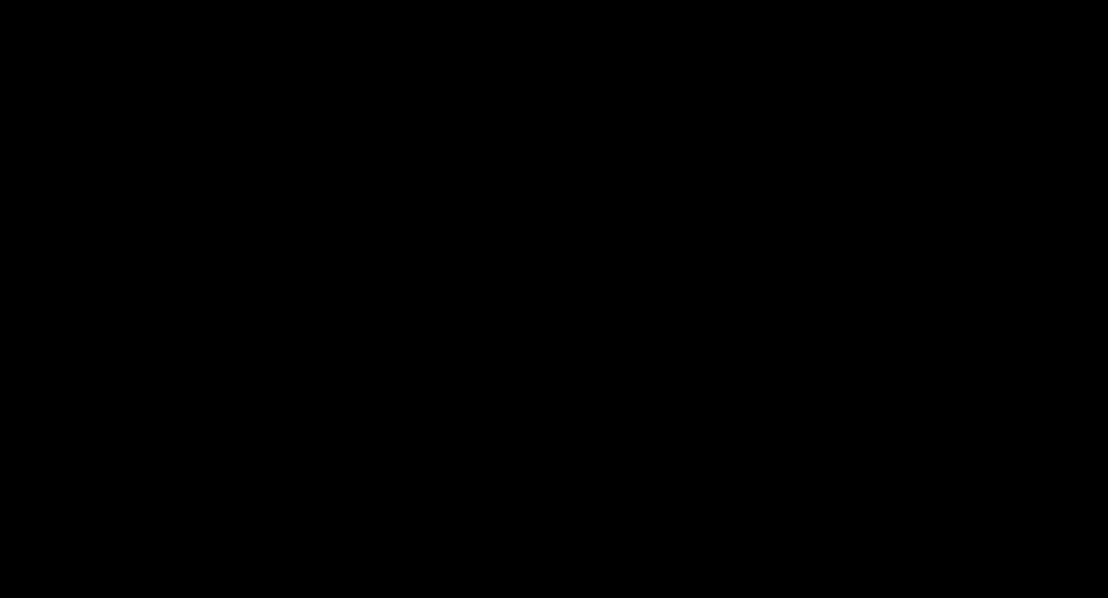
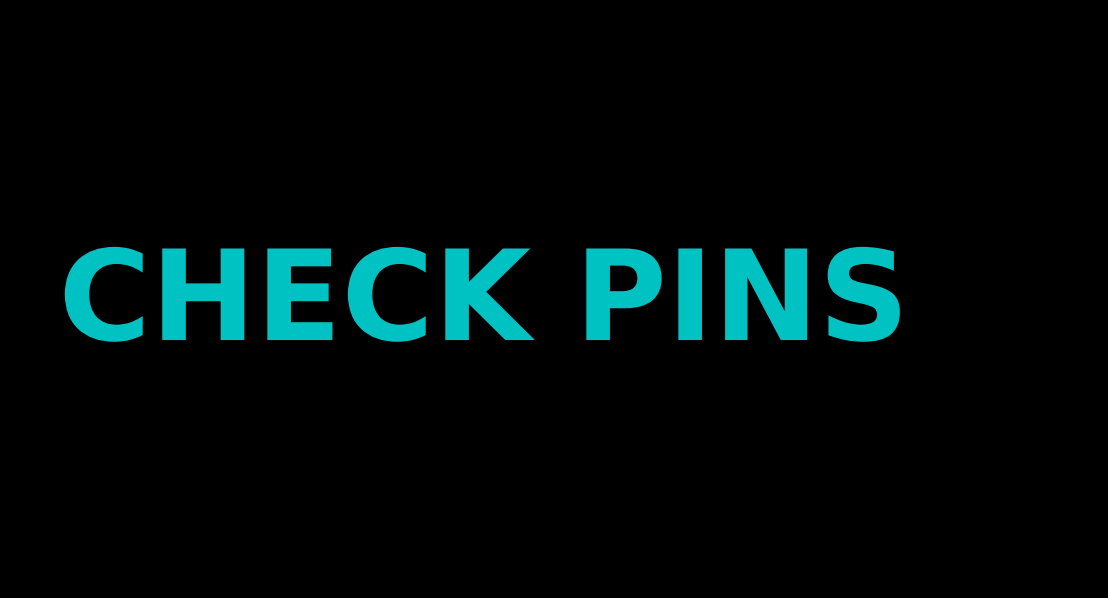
text: none -> CHECK PINS (482, 294)

